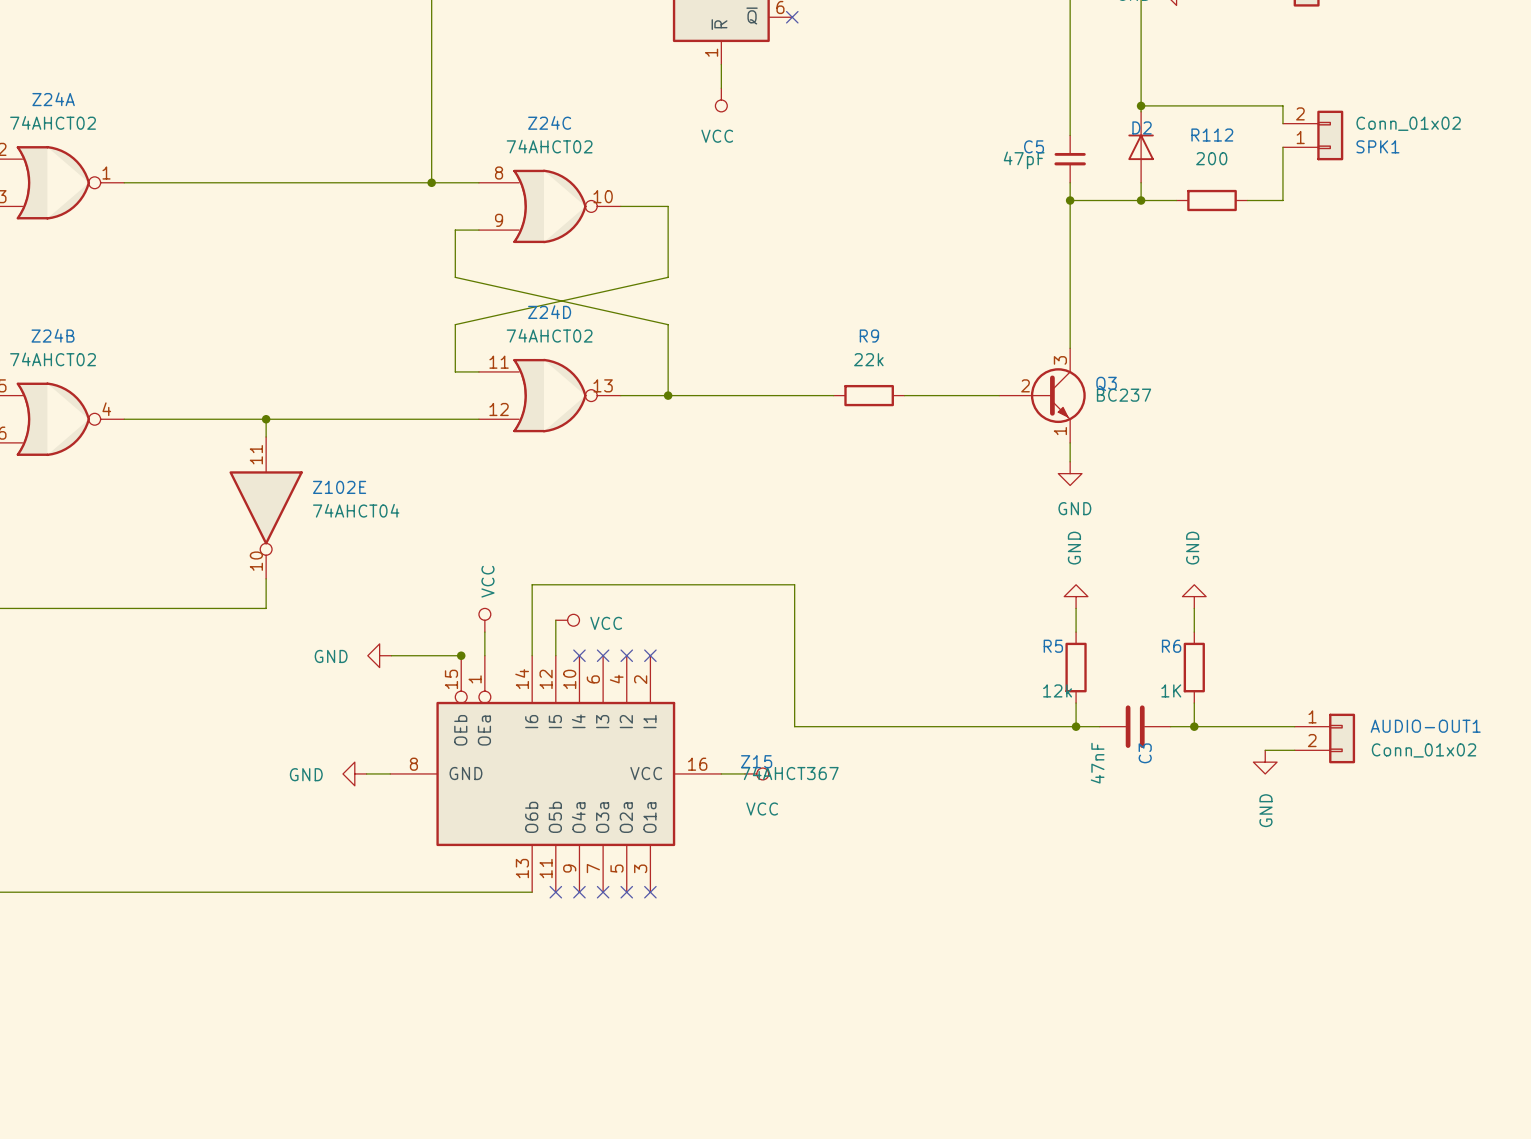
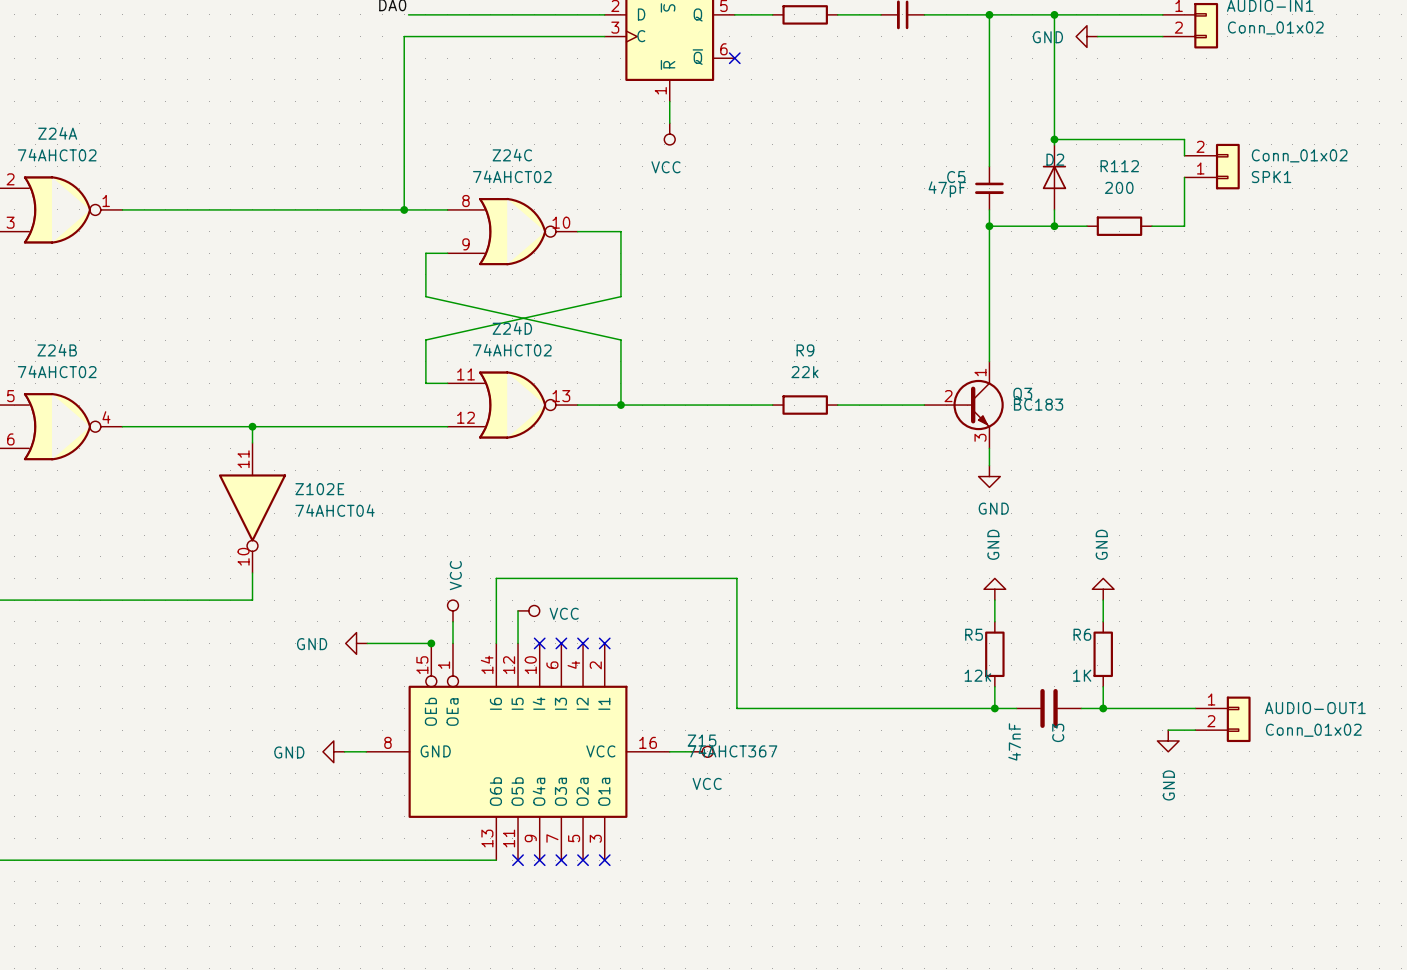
Q3 pin number: 3 (1060, 360) -> 1 (980, 372)
Q3 value: BC237 (1124, 395) -> BC183 (1038, 404)
Q3 pin number: 1 (1060, 431) -> 3 (980, 437)

